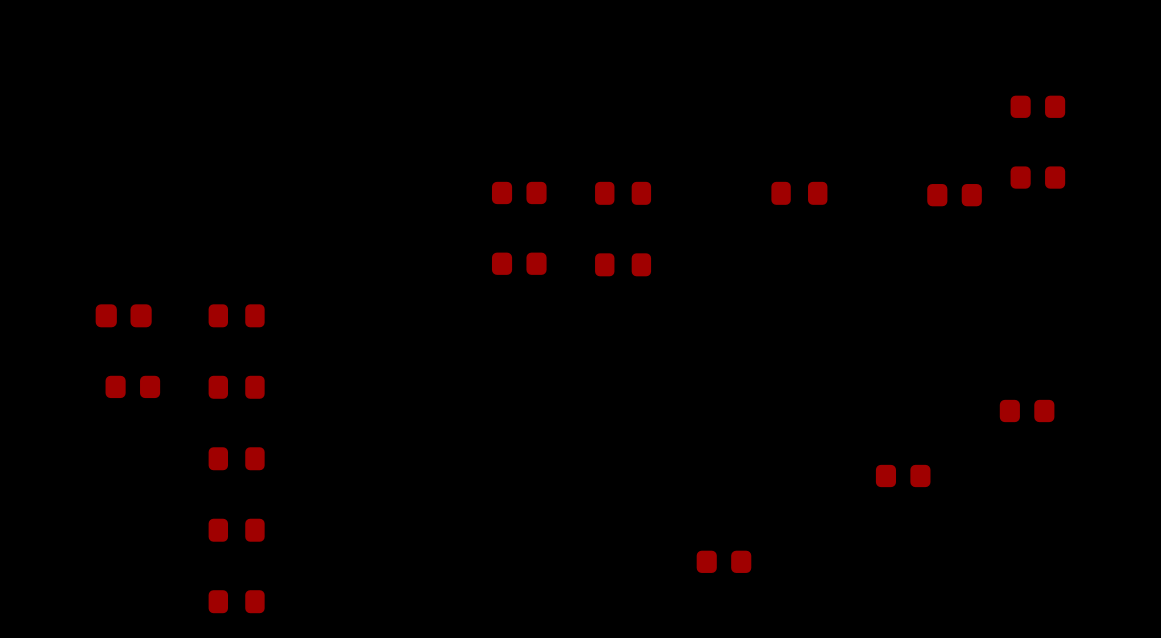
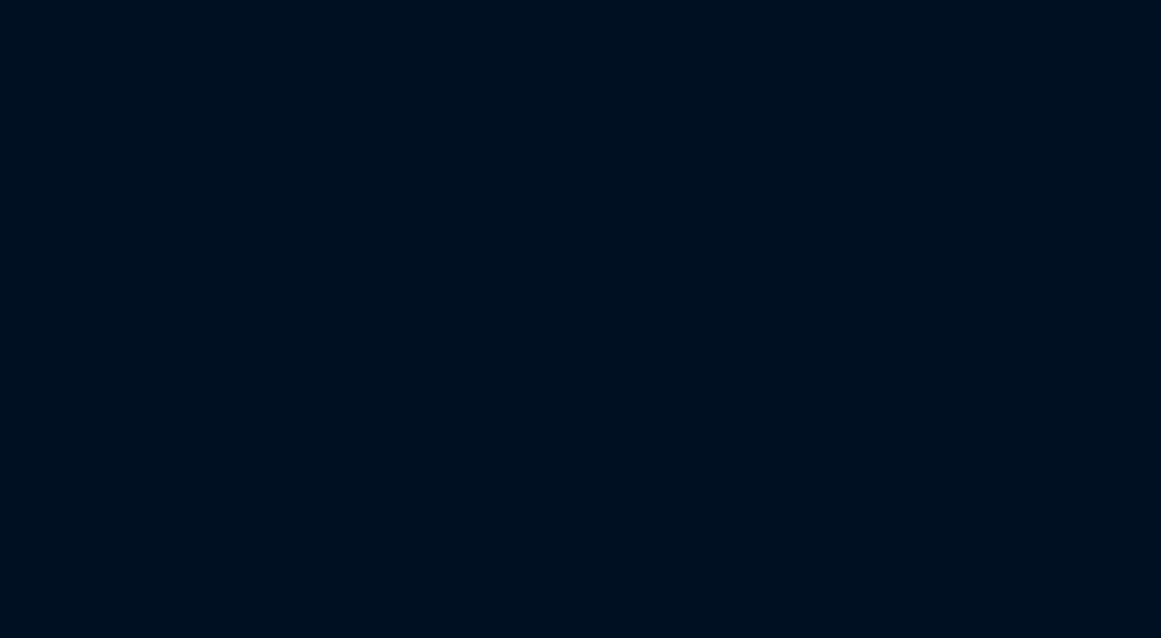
part: (1037, 106) -> none
part: (1037, 177) -> none
part: (519, 192) -> none
part: (623, 193) -> none
part: (799, 193) -> none
part: (954, 195) -> none
part: (519, 263) -> none
part: (623, 264) -> none
part: (123, 315) -> none
part: (236, 315) -> none
part: (132, 386) -> none
part: (236, 387) -> none
part: (1027, 410) -> none
part: (236, 458) -> none
part: (903, 475) -> none
part: (236, 530) -> none
part: (723, 561) -> none
part: (236, 601) -> none

